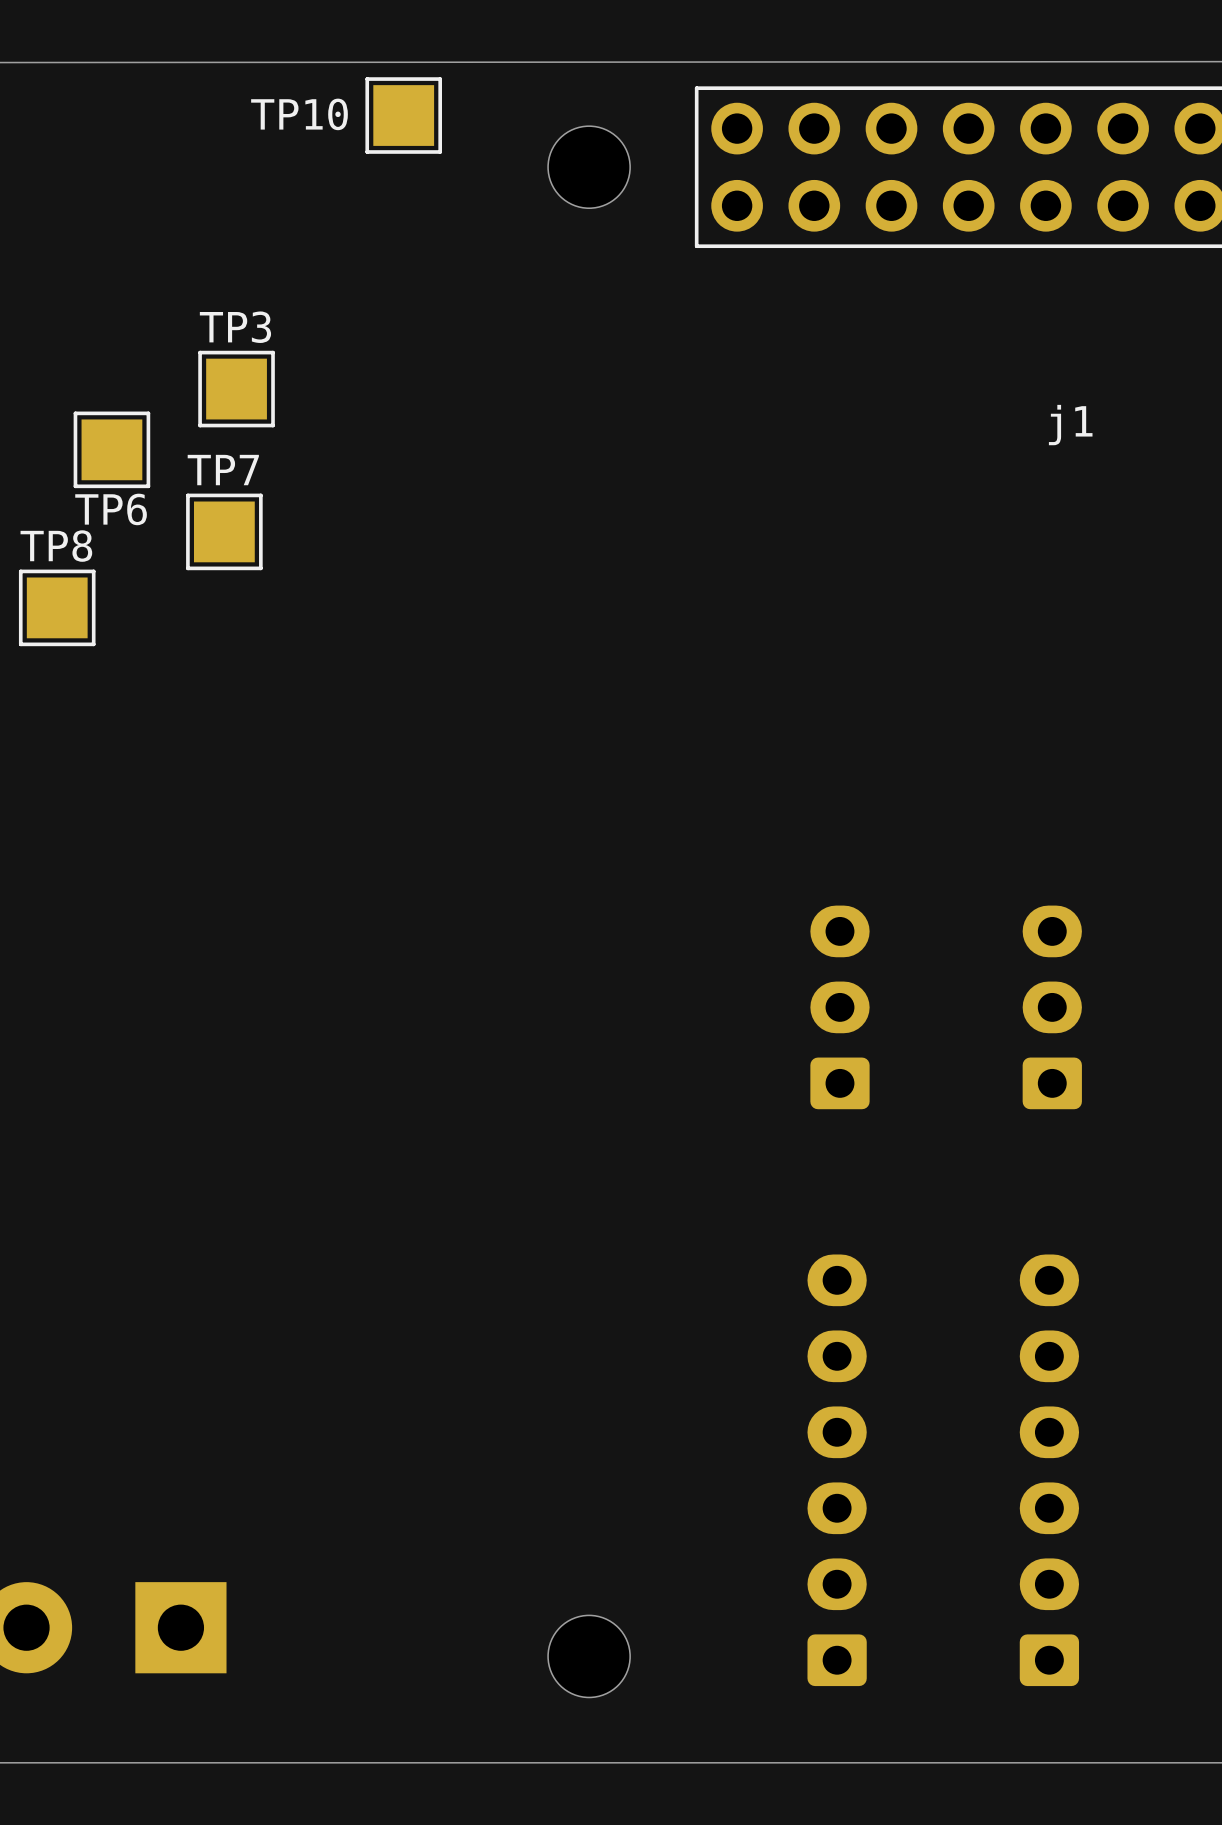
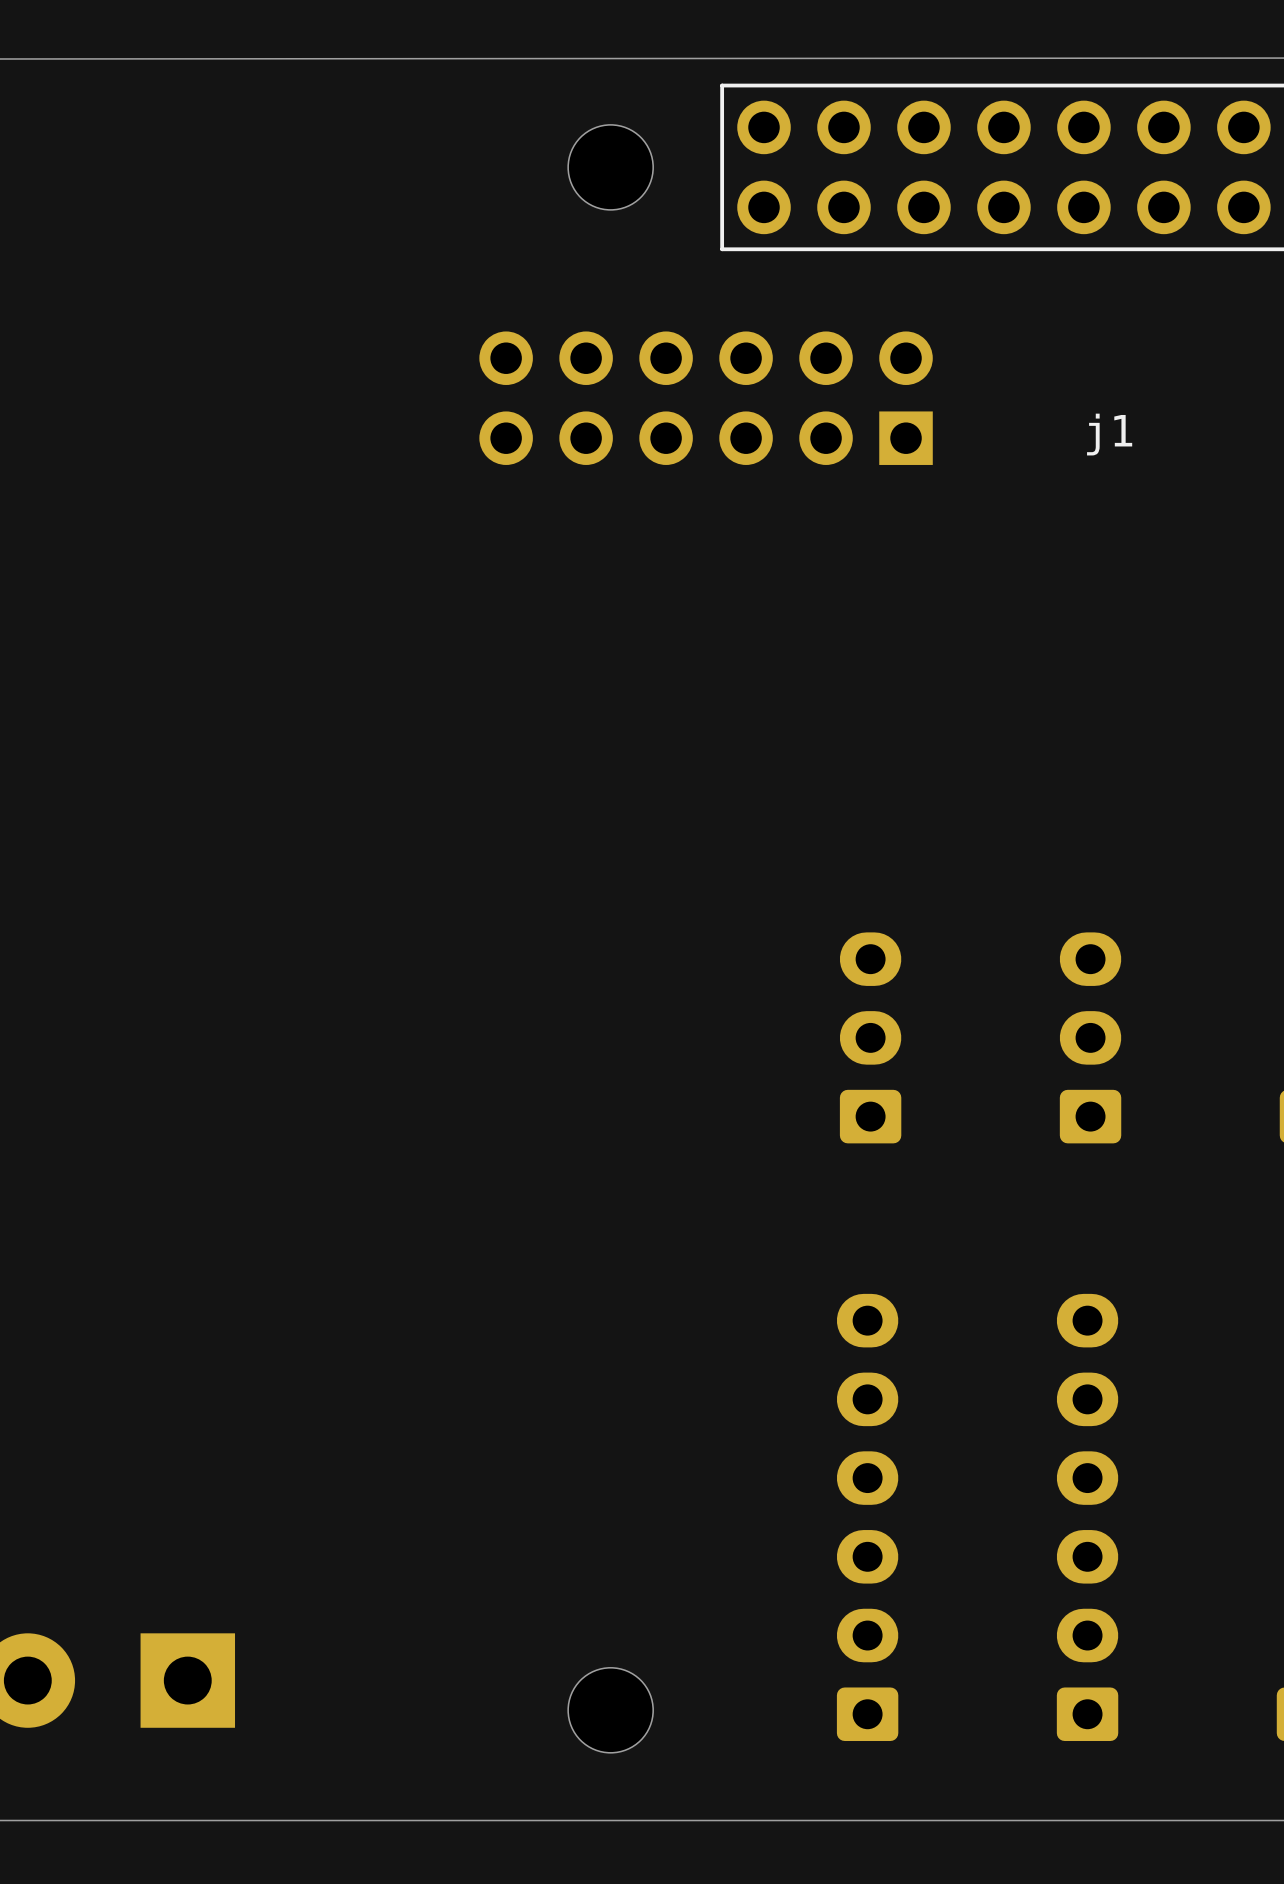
TP10: (403, 115) -> none
TP3: (236, 389) -> none
part: none -> (706, 398)
TP6: (111, 449) -> none
TP7: (224, 531) -> none
TP8: (57, 607) -> none

